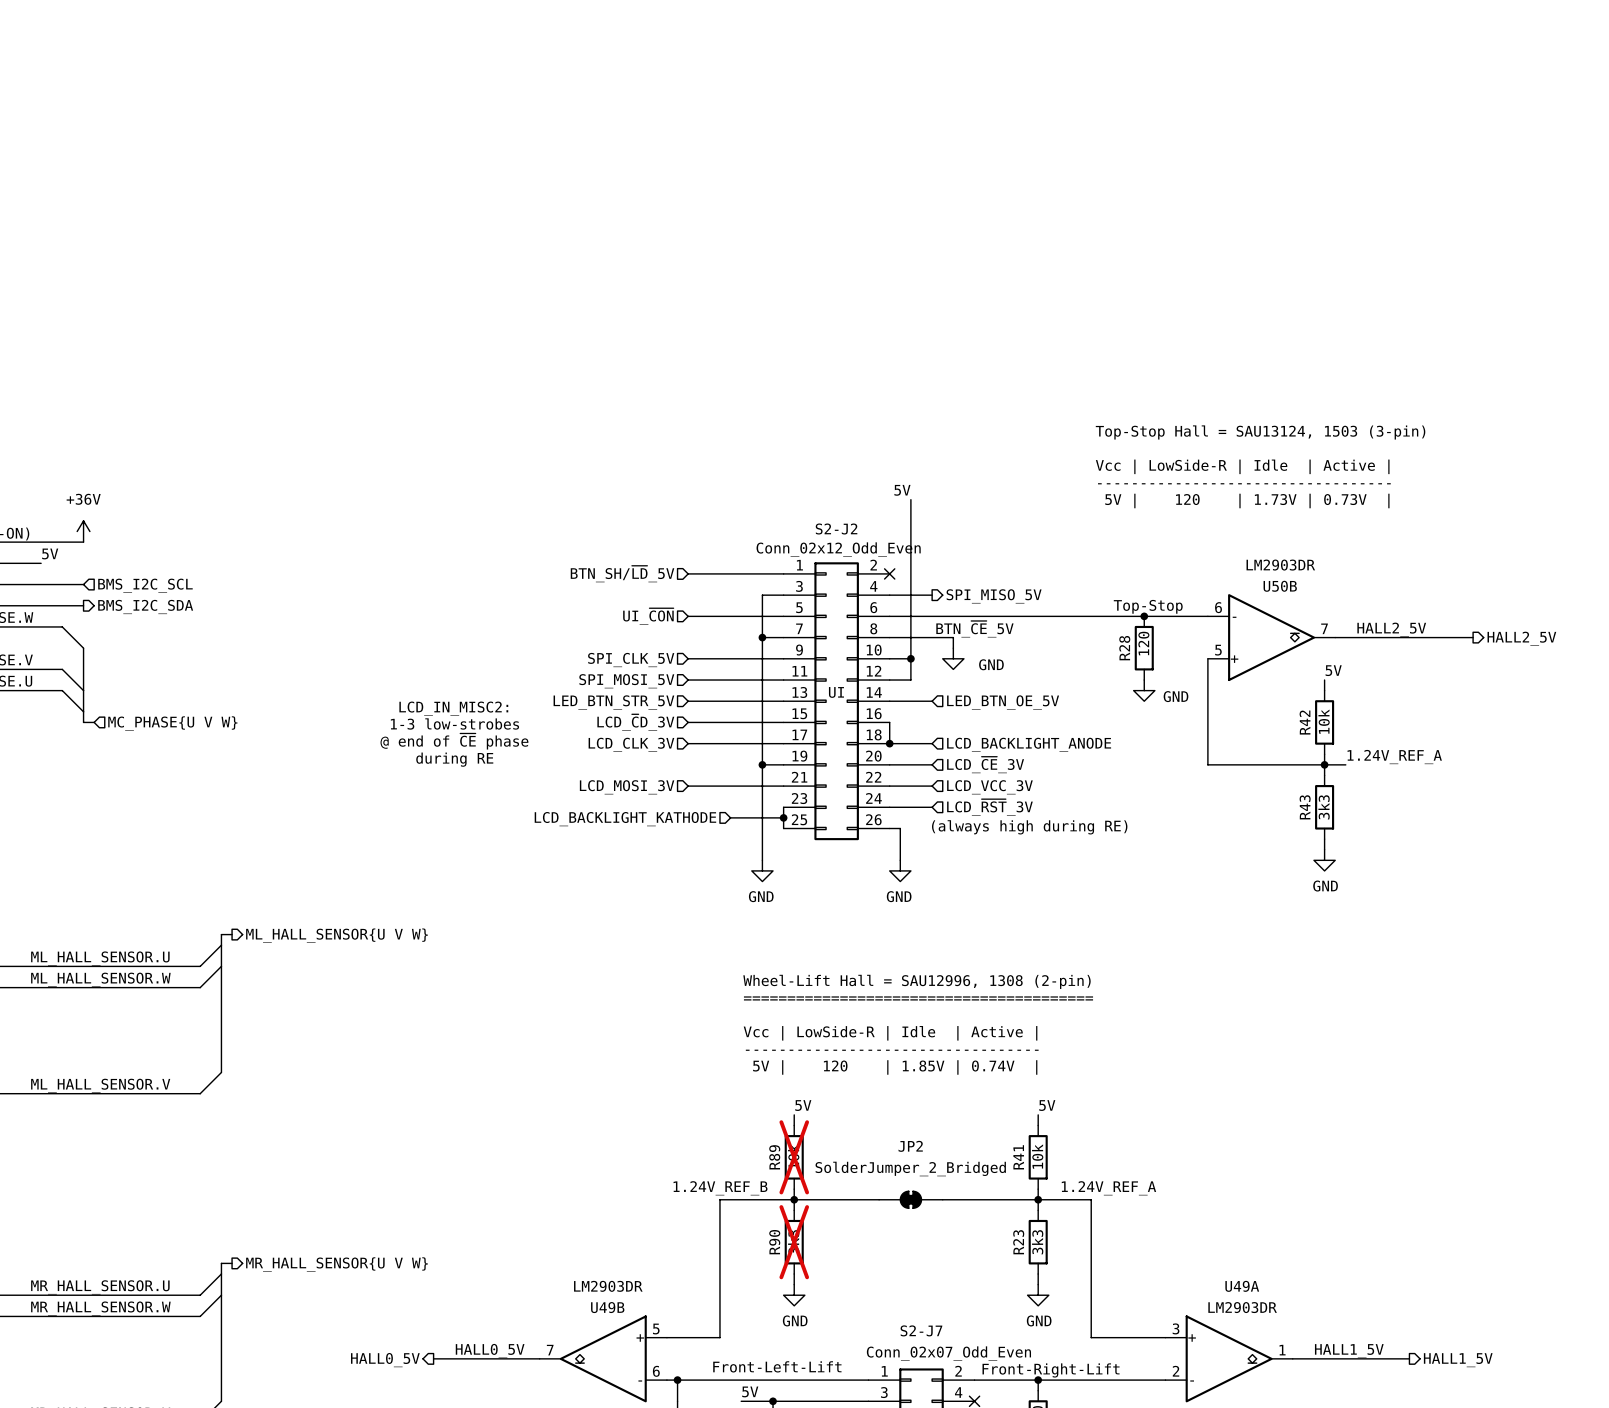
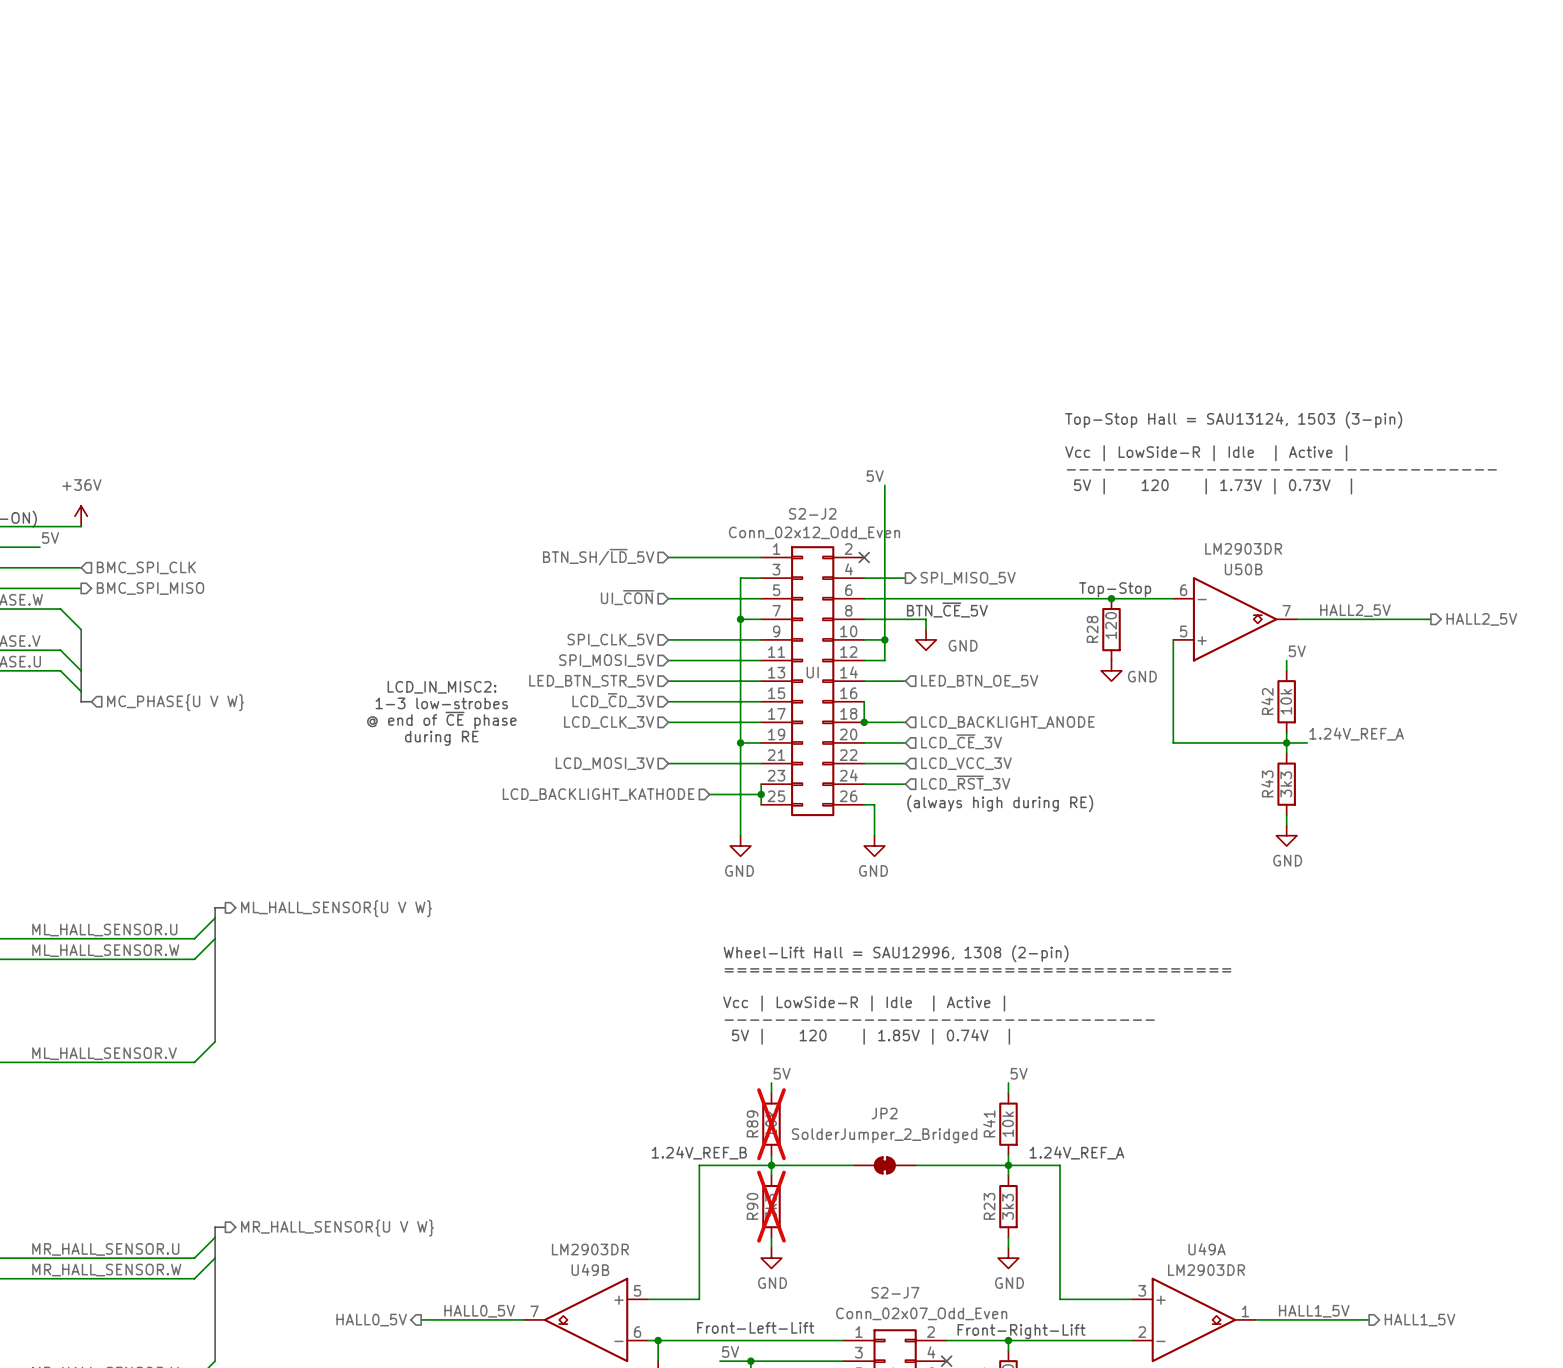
hierarchical label: BMS_I2C_SCL (145, 585) -> BMC_SPI_CLK (146, 567)
hierarchical label: BMS_I2C_SDA (145, 606) -> BMC_SPI_MISO (150, 588)

